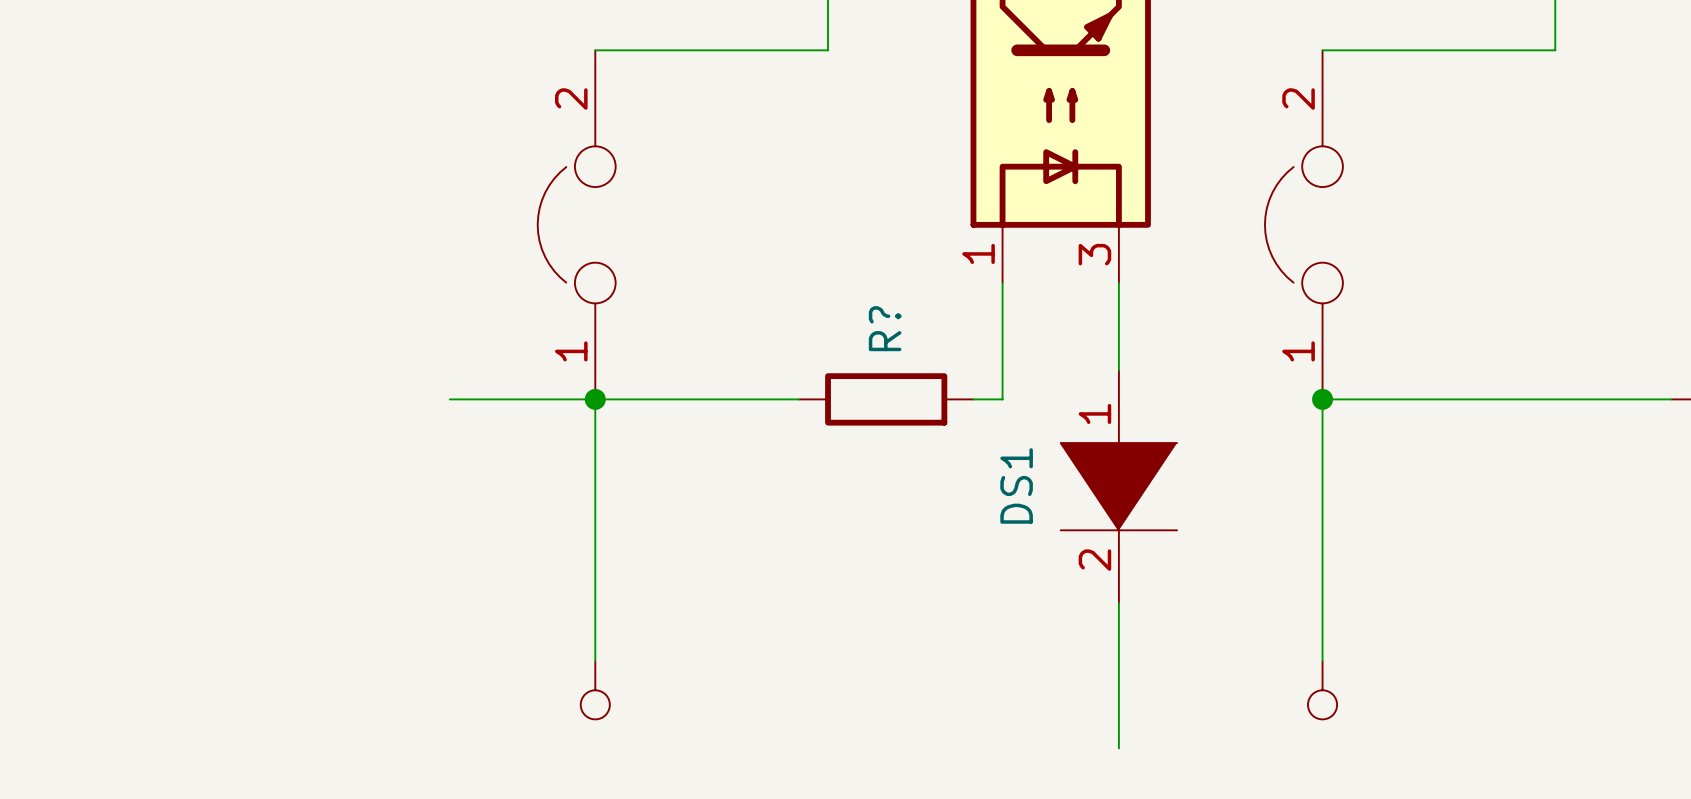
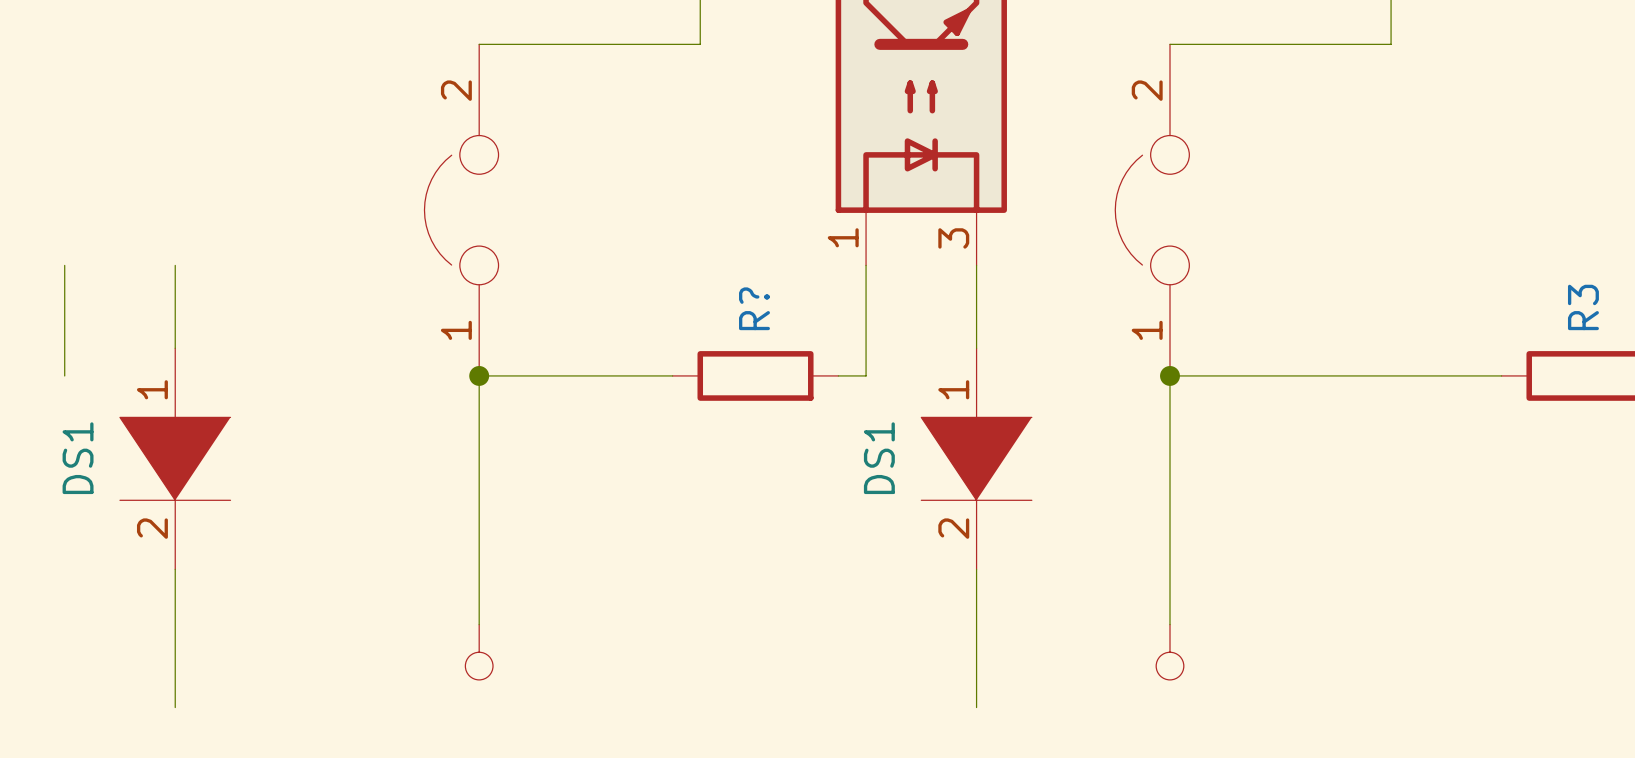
wire: none -> (64, 265) (64, 375)
wire: none -> (175, 265) (175, 348)
wire: (449, 399) (595, 399) -> none
part: none -> DS1 (175, 458)
wire: none -> (175, 569) (175, 707)

